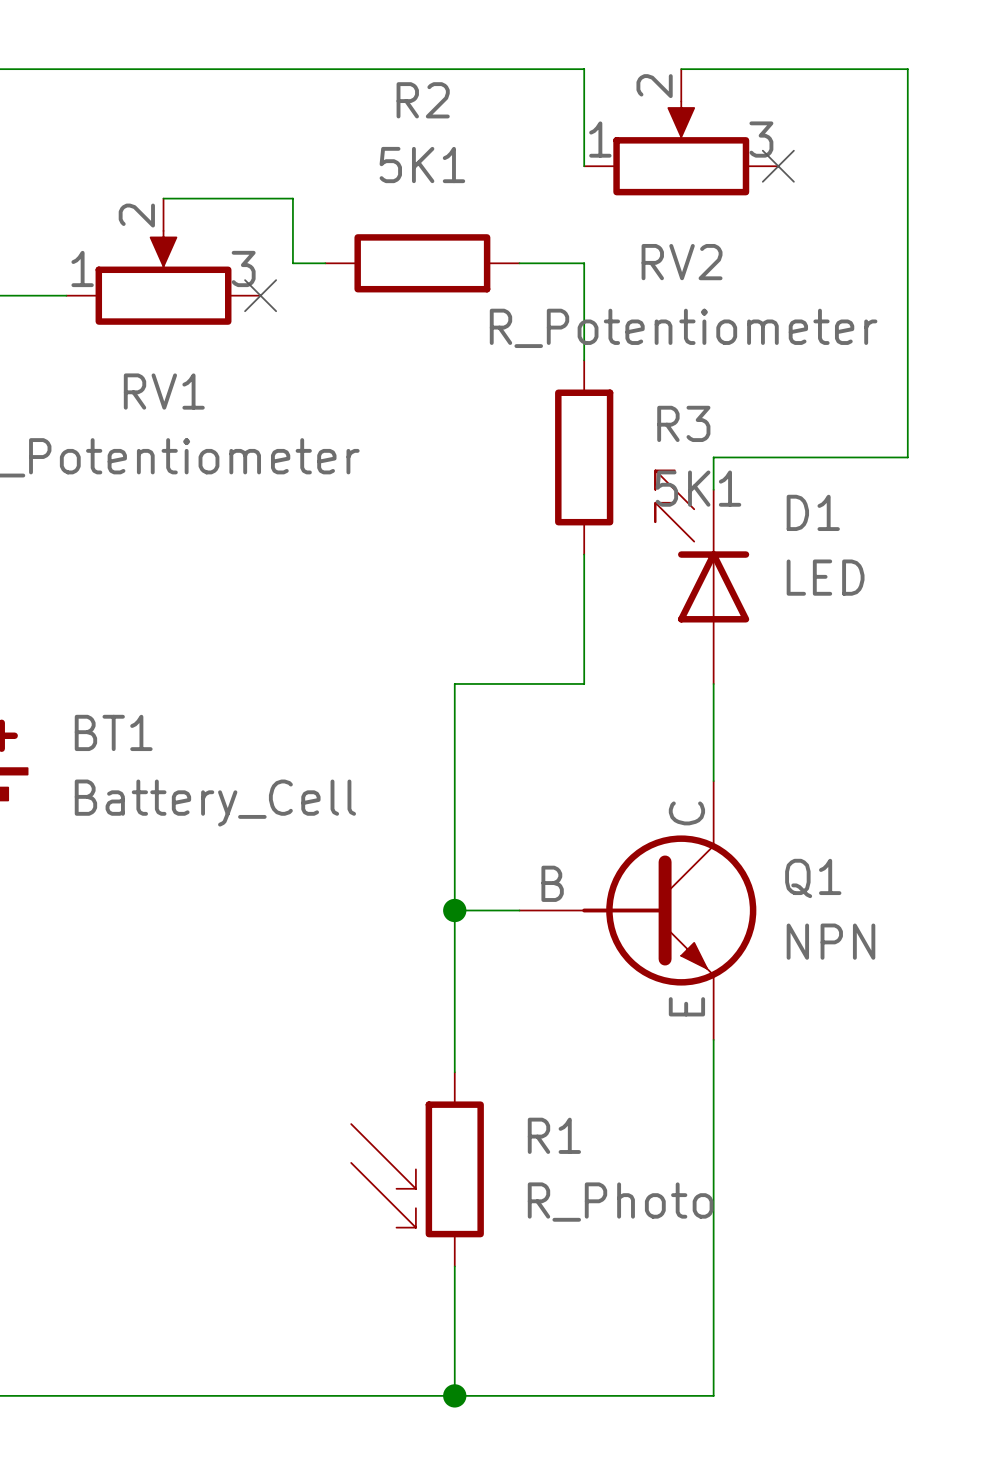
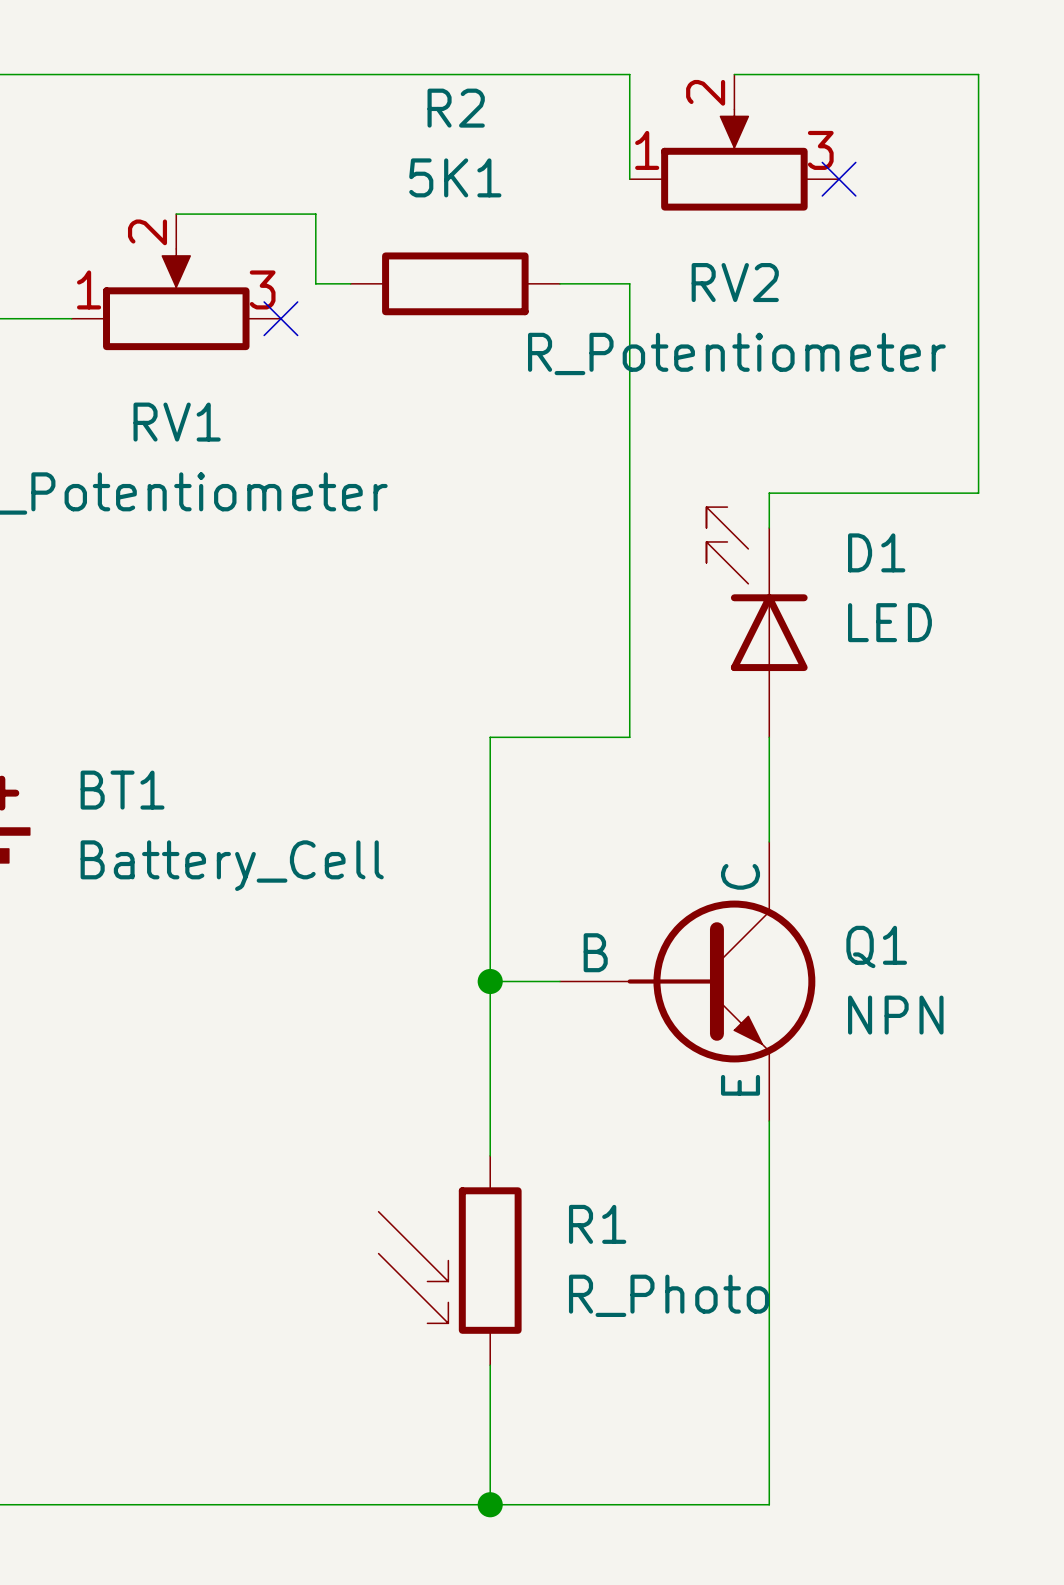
wire: none -> (629, 388) (629, 597)
R3: 5K1 (584, 457) -> none

